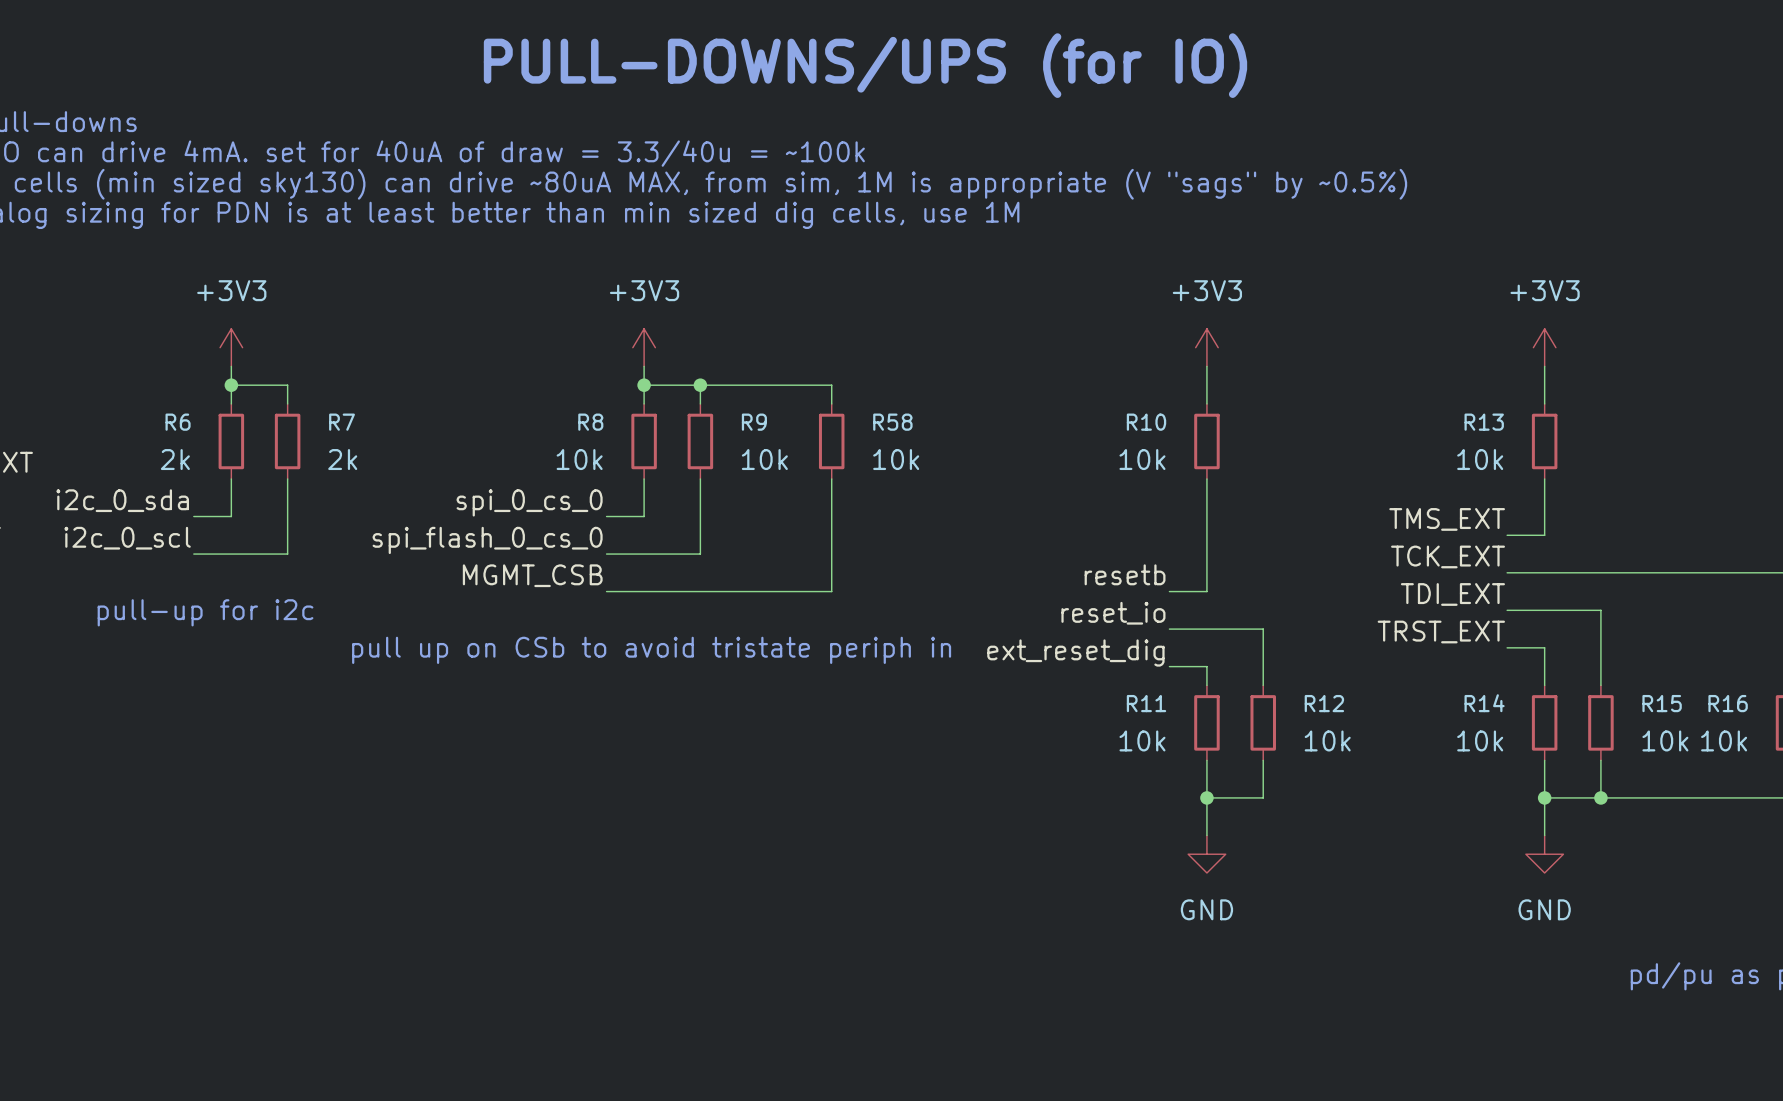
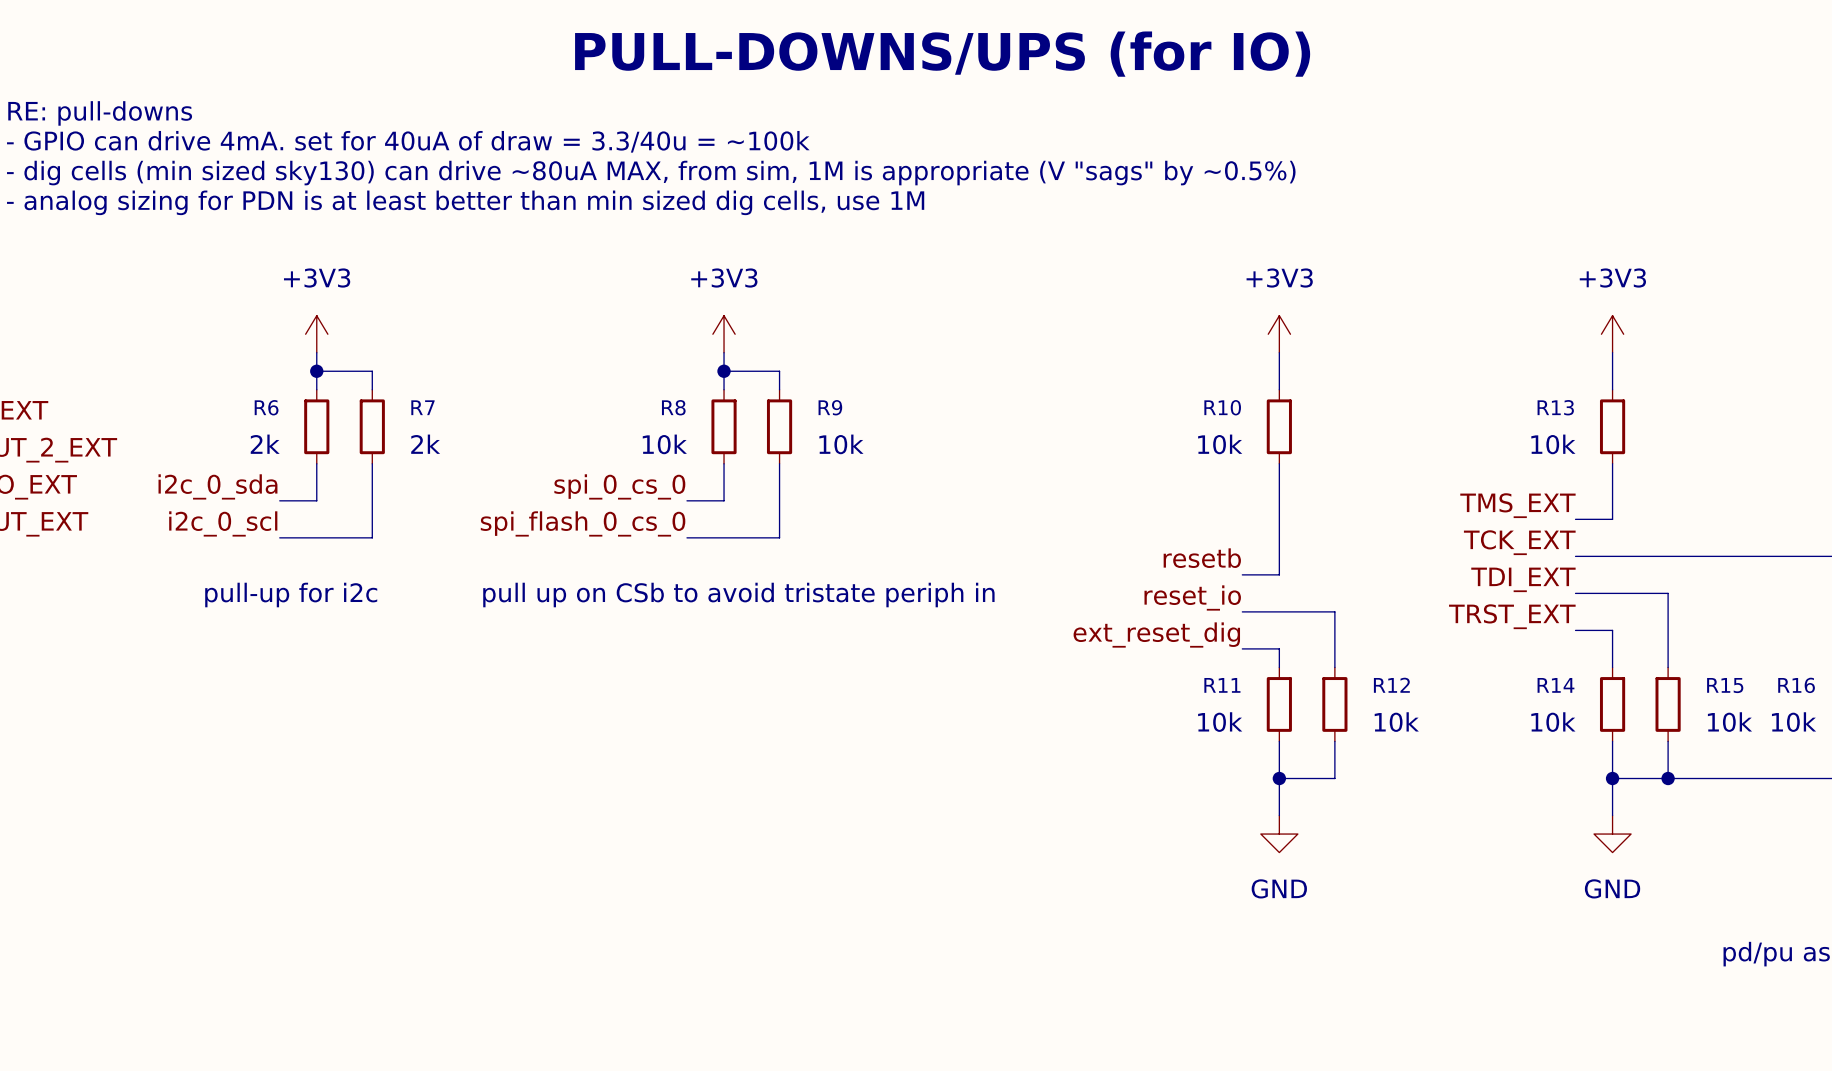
wire: (700, 385) (831, 385) (831, 403) -> none
junction: (700, 385) -> none
R58: 10k (831, 441) -> none
wire: (831, 479) (831, 591) (606, 591) -> none
label: MGMT_CSB (532, 575) -> none
text position: pull up on CSb to avoid tristate periph in (651, 650) -> pull up on CSb to avoid tristate periph in (738, 595)

